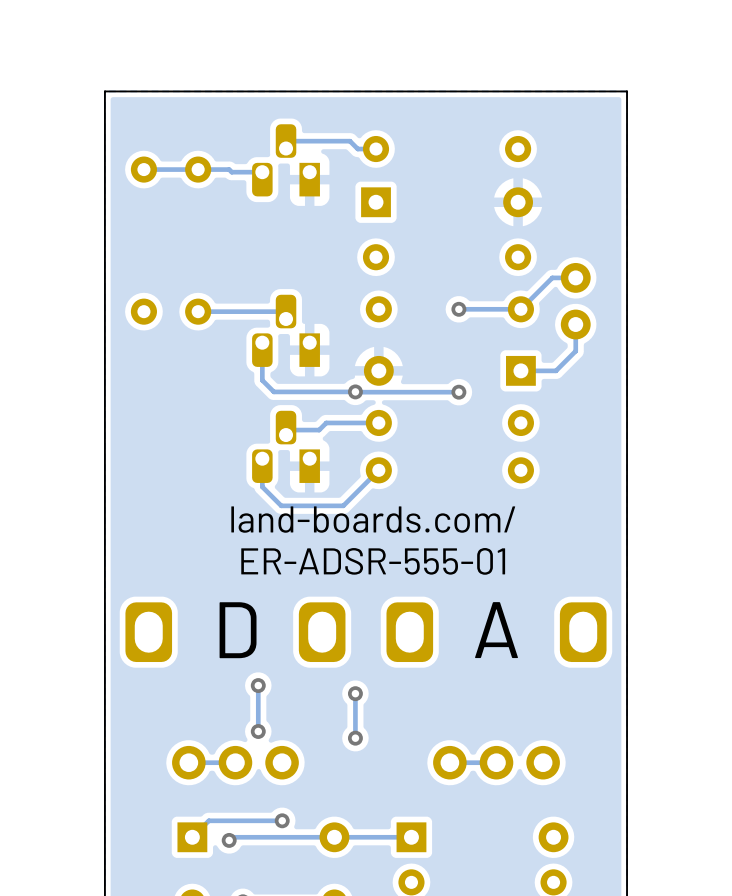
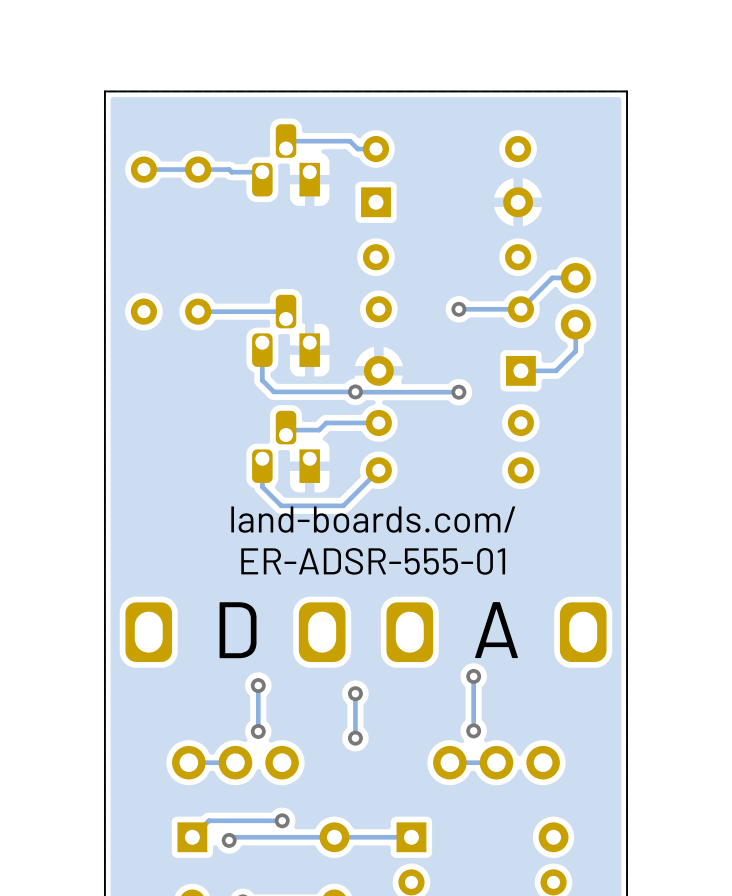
track: none -> (473, 676) (473, 730)
via: none -> (473, 676)
via: none -> (473, 730)

